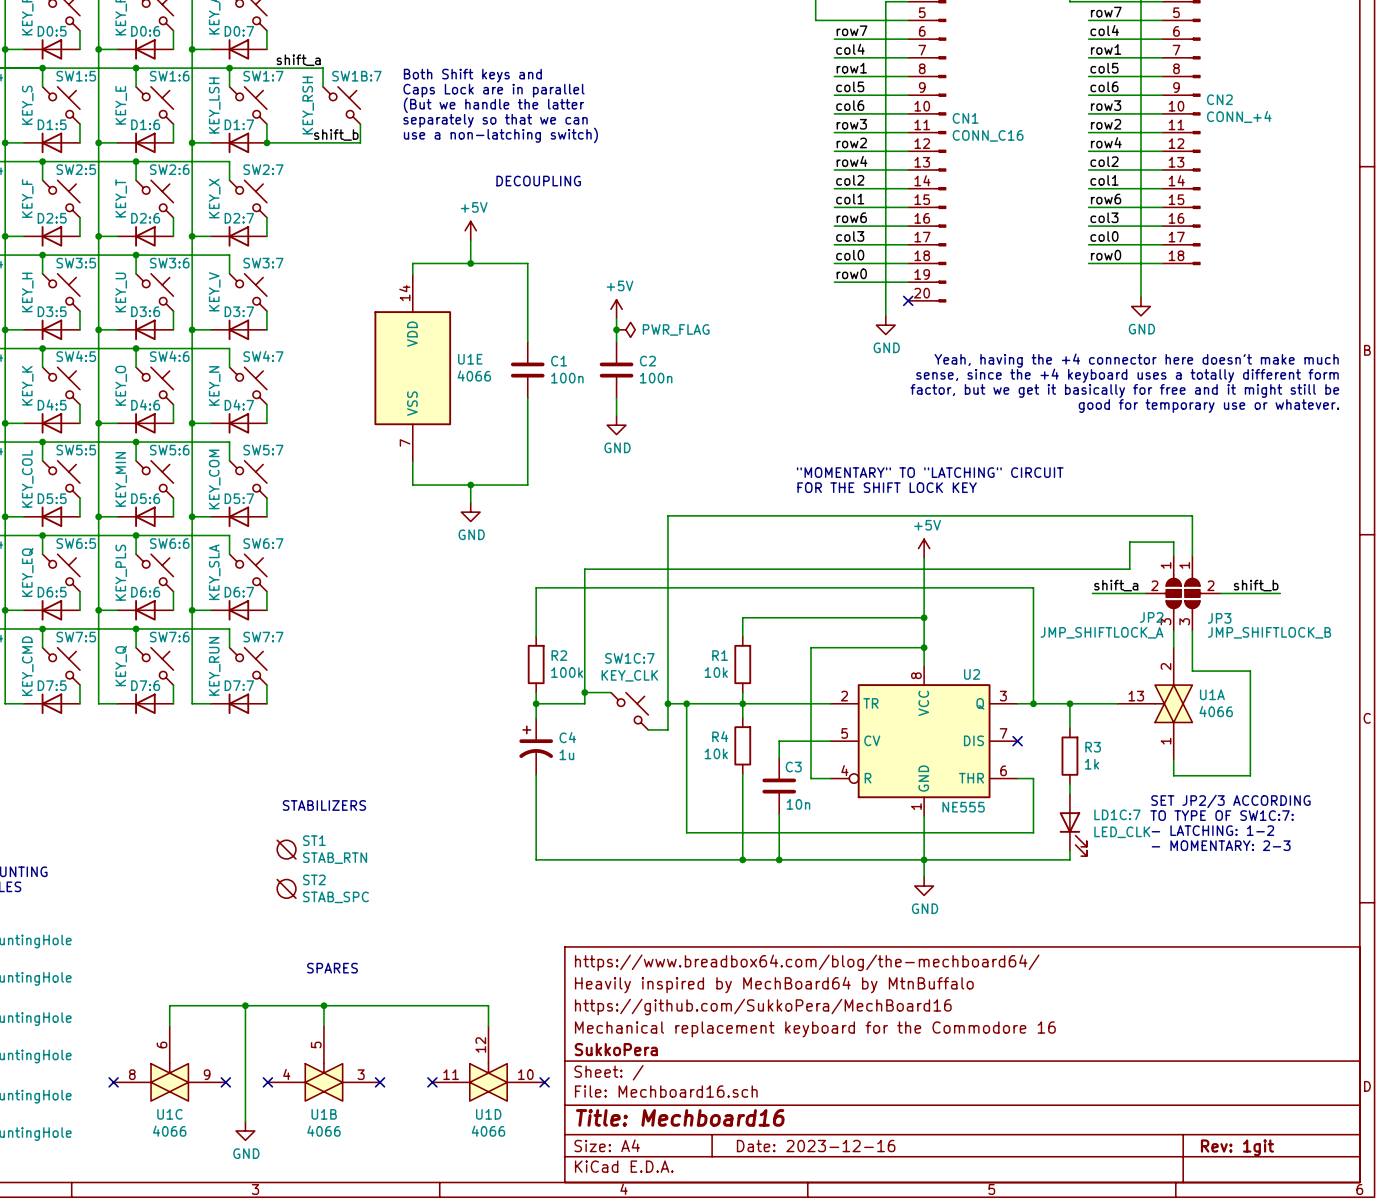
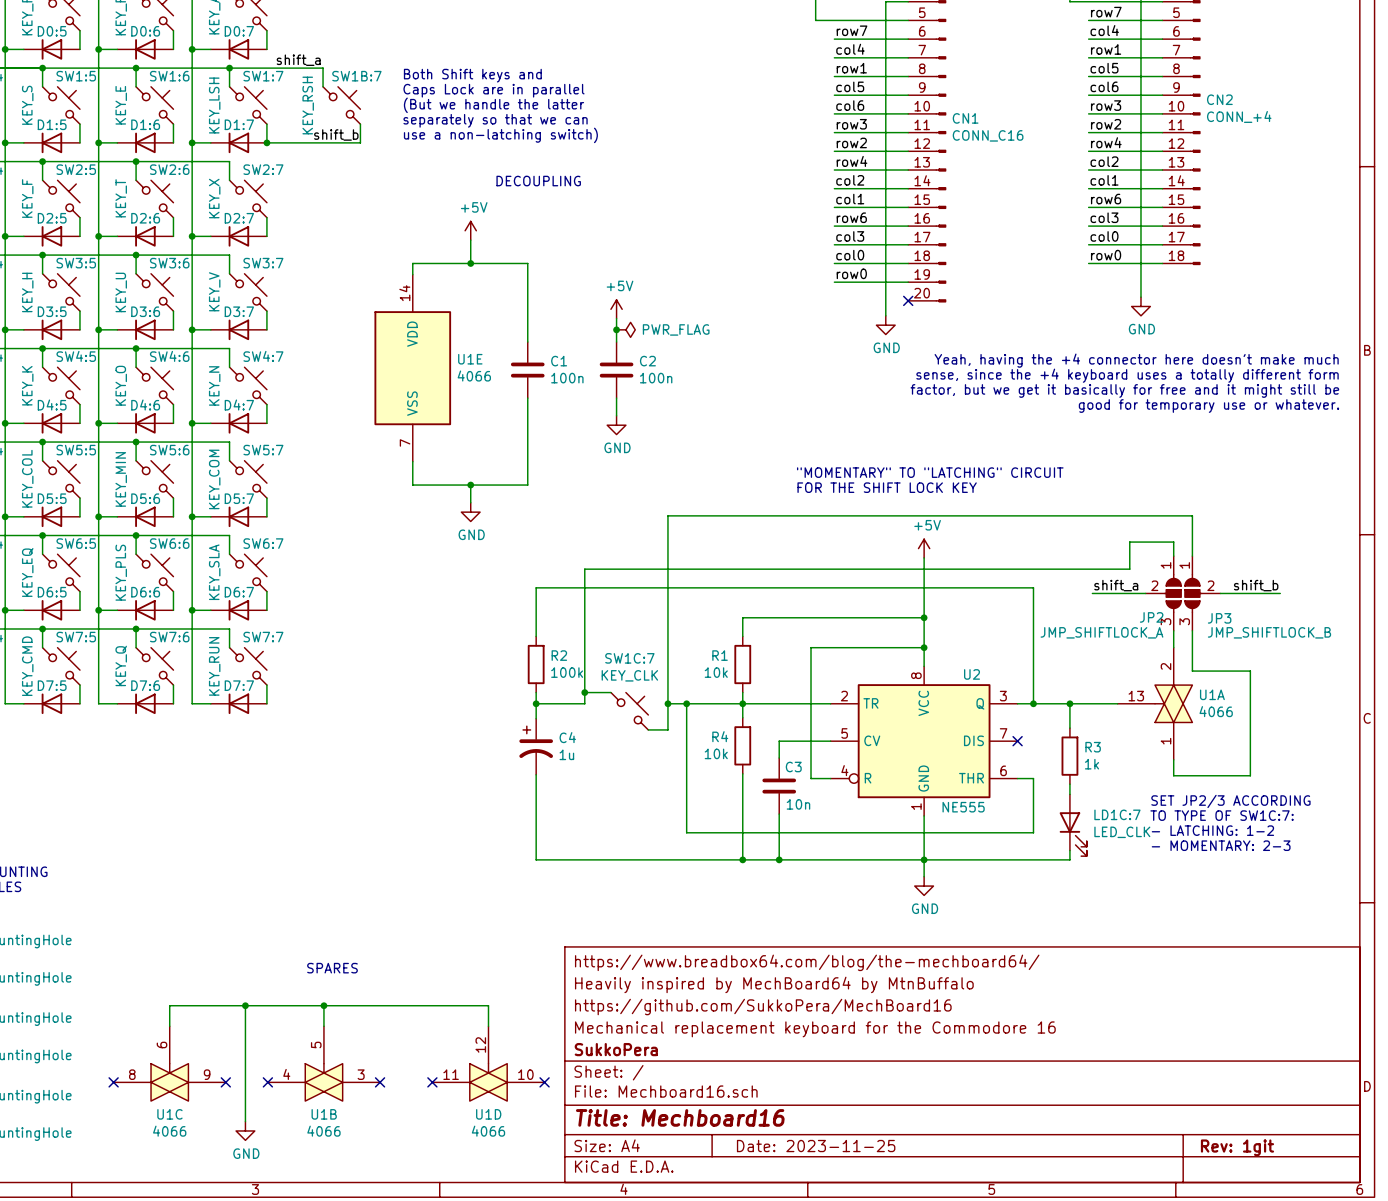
text: STABILIZERS (324, 805) -> none
ST1: STAB_RTN (286, 849) -> none
ST2: STAB_SPC (286, 888) -> none
title block: Date: 2023-12-16 (816, 1146) -> Date: 2023-11-25 (816, 1146)

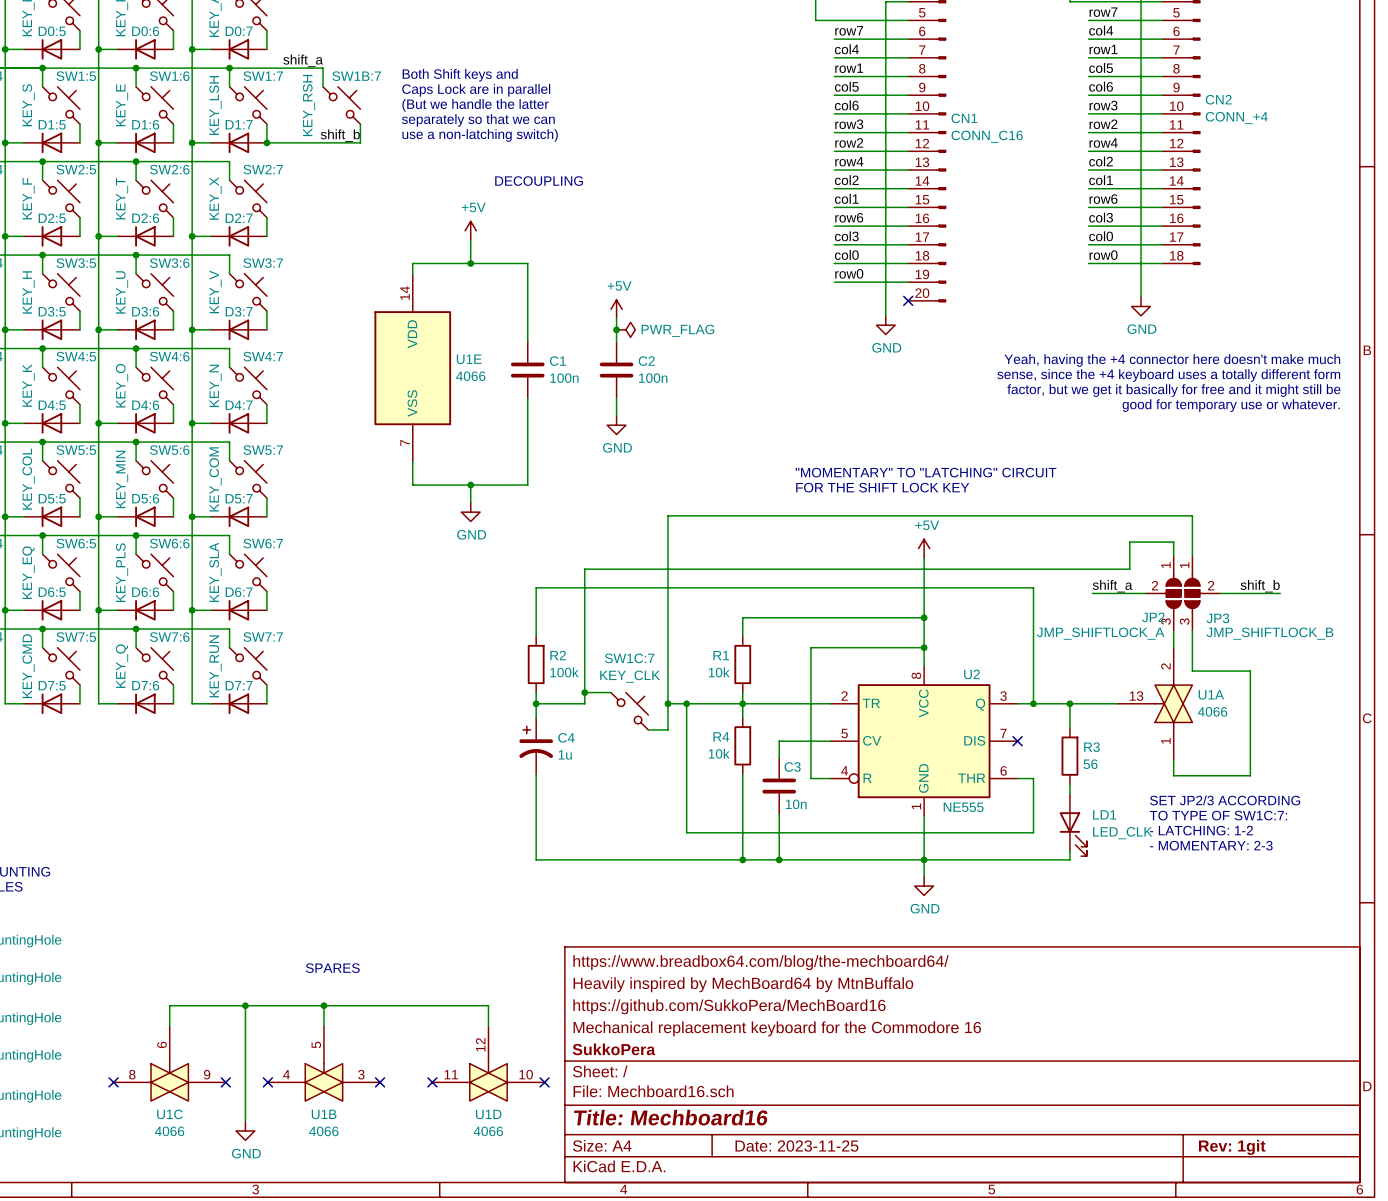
R3 value: 1k (1092, 764) -> 56 (1090, 764)
LD1 name: LD1C:7 (1117, 814) -> LD1 (1104, 814)

